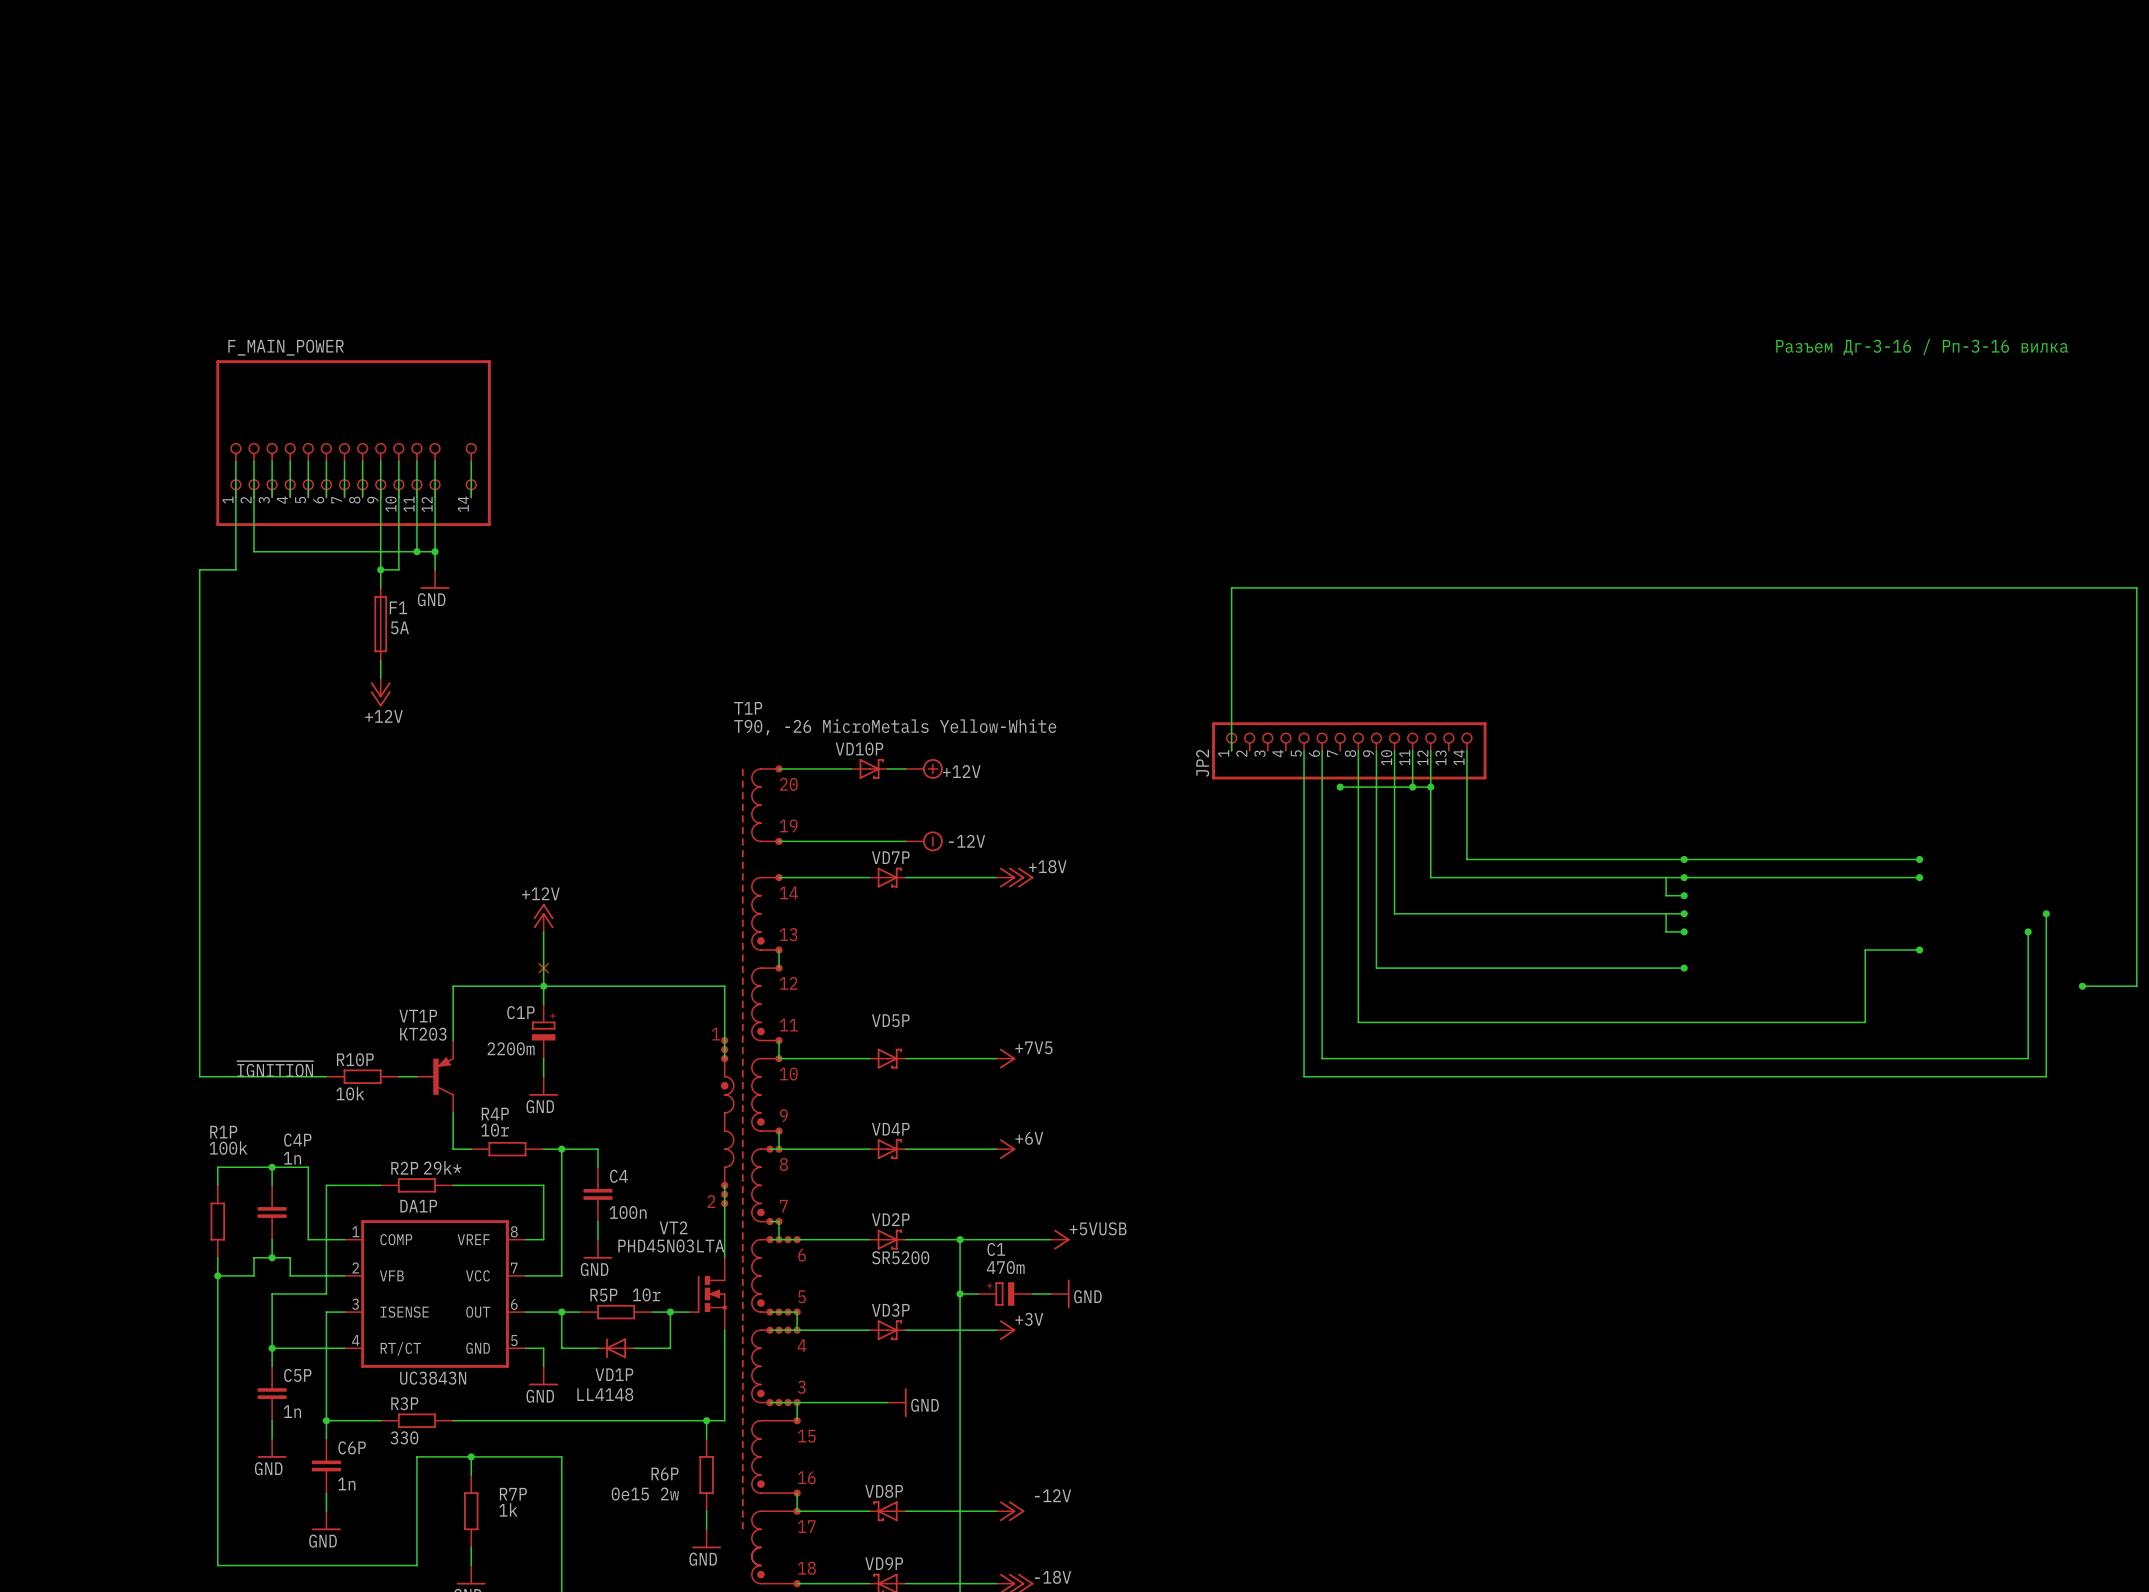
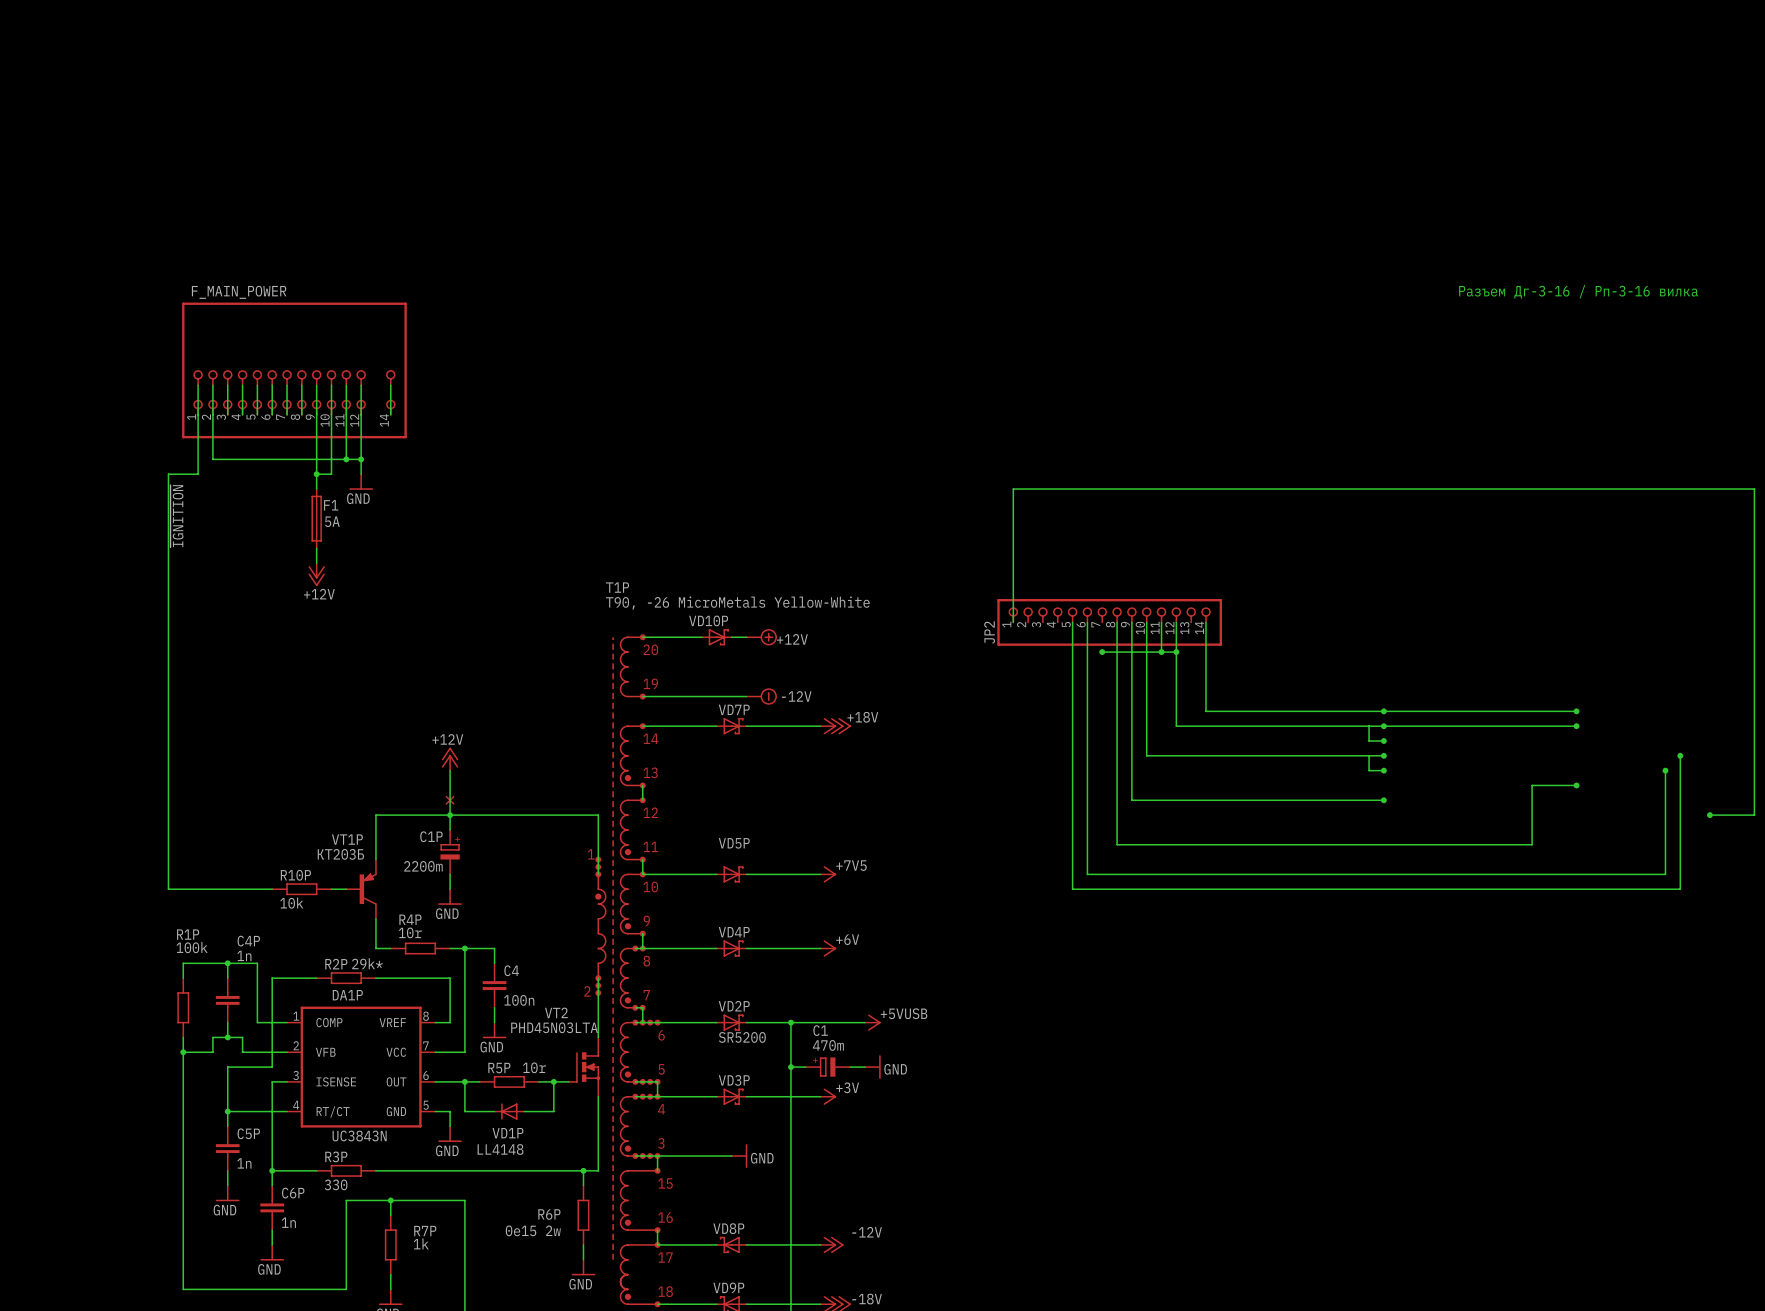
label: none -> ~{IGNITION} (176, 516)
VT1P value: КТ203 (423, 1034) -> КТ203Б (340, 854)
label: ~{IGNITION} (275, 1069) -> none

